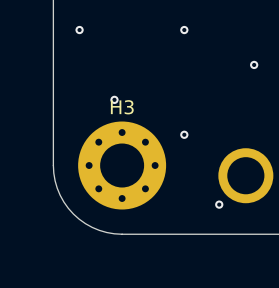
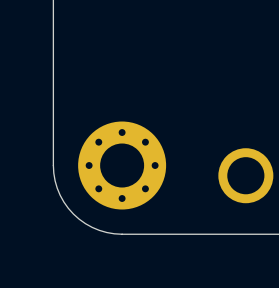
via: (79, 30) -> none
via: (184, 30) -> none
via: (254, 64) -> none
via: (114, 99) -> none
H3 name: H3 (122, 107) -> none
via: (184, 134) -> none
via: (219, 204) -> none

